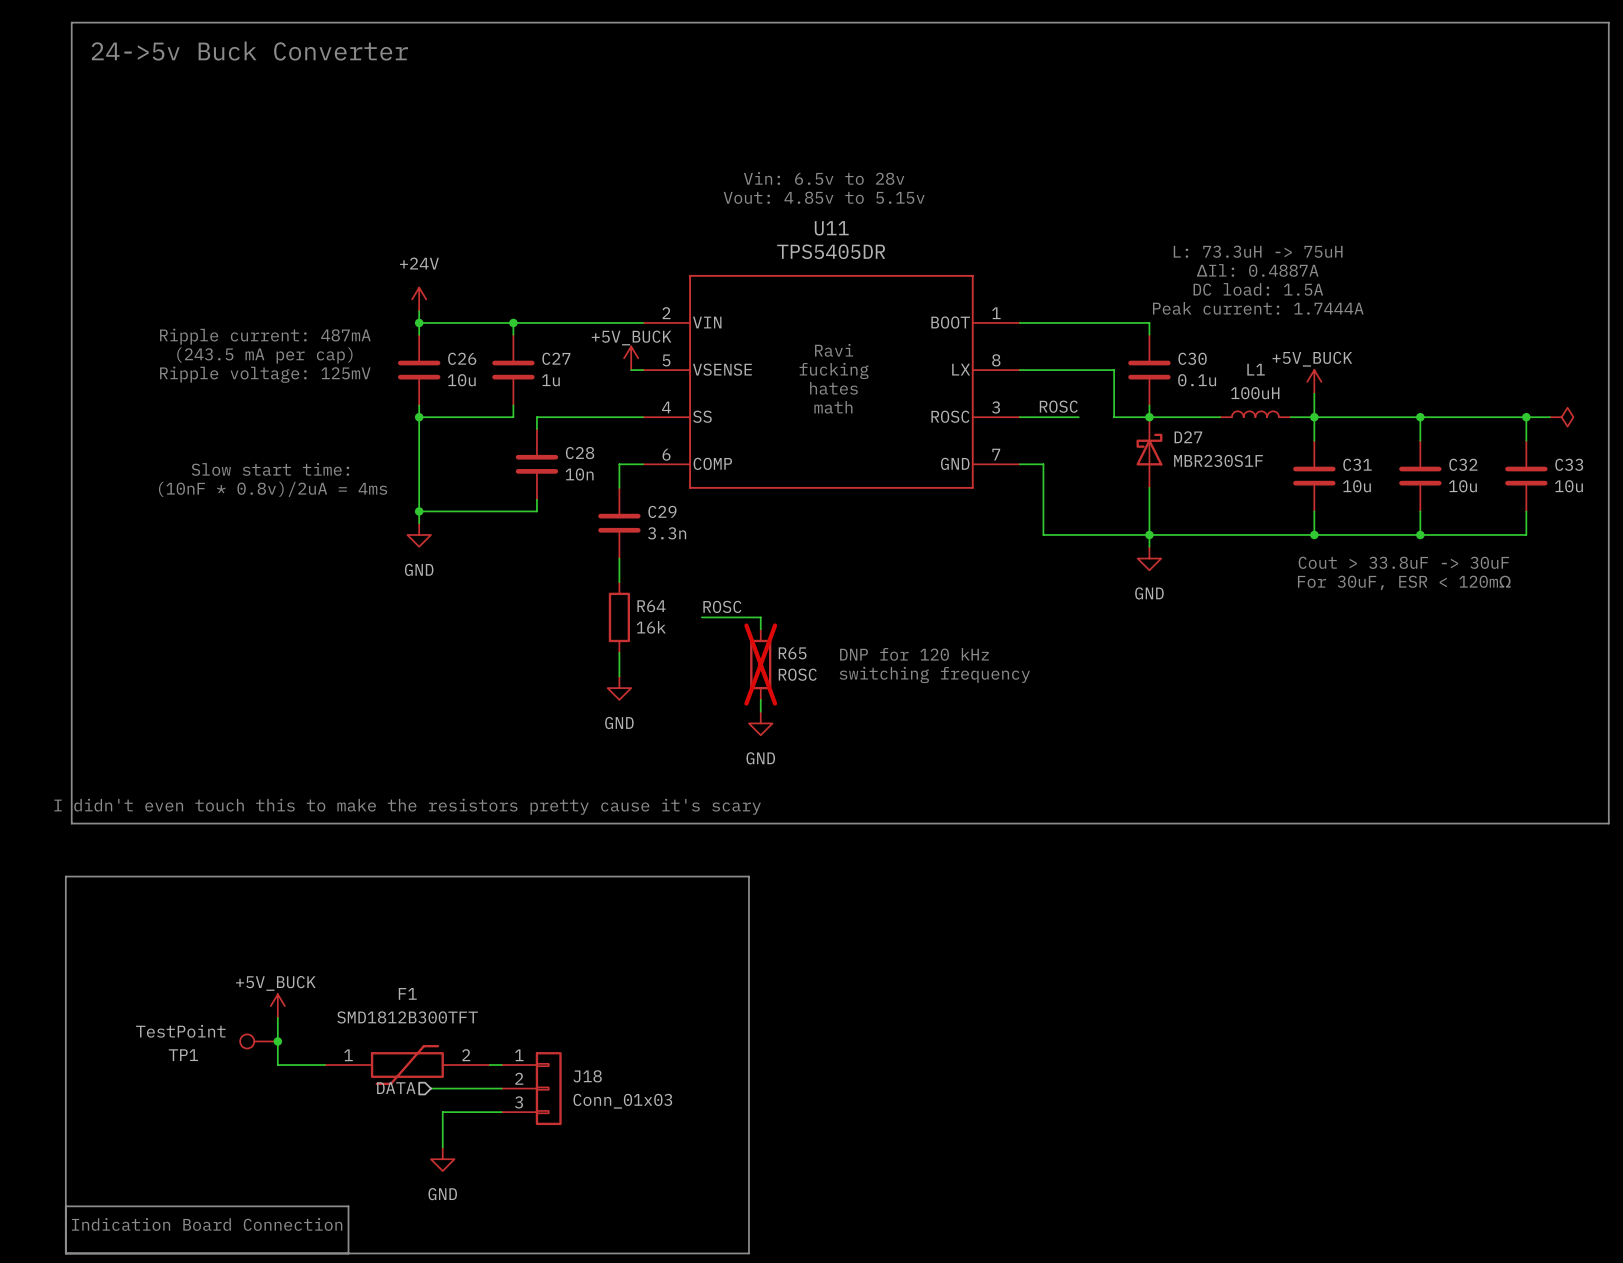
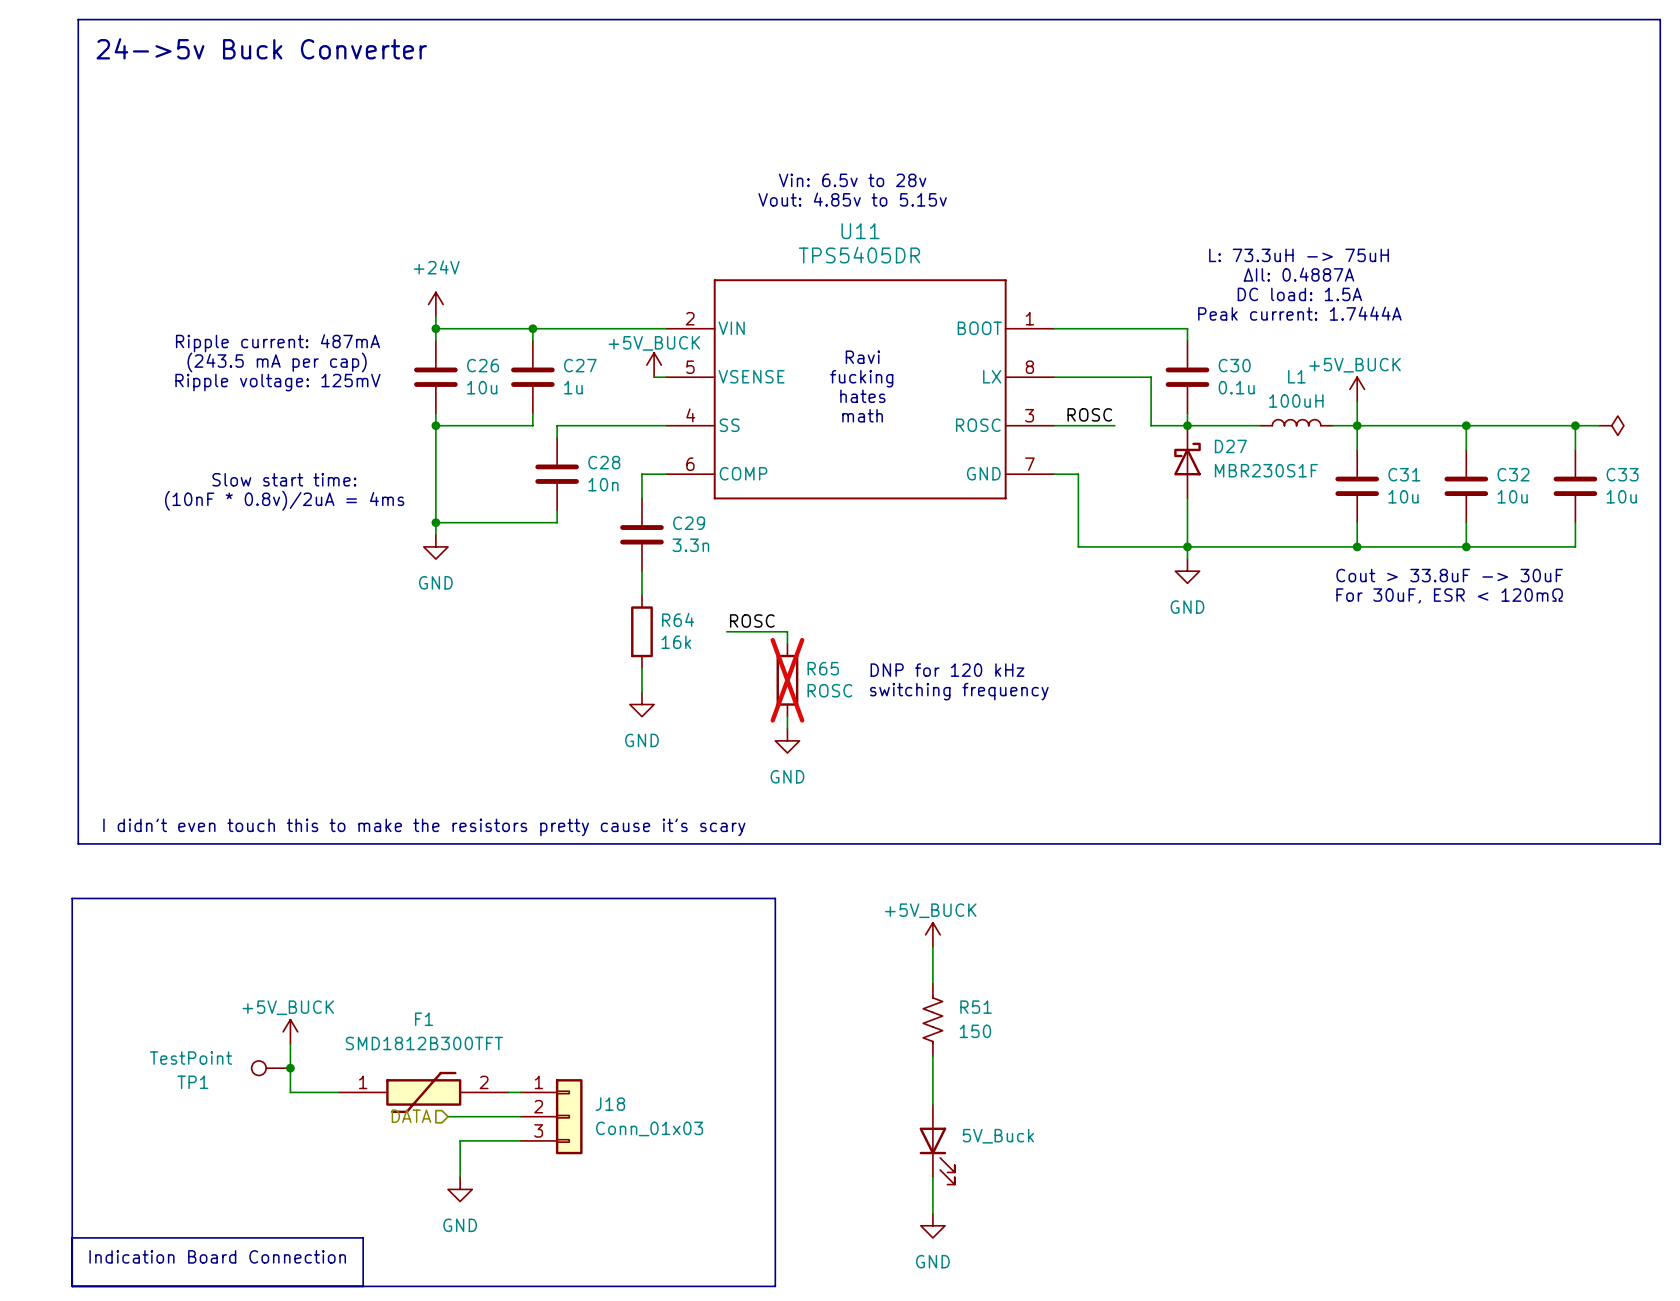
power symbol: none -> +5V_BUCK (932, 934)
wire: none -> (932, 946) (932, 983)
R51: none -> 150 (932, 1019)
wire: none -> (932, 1056) (932, 1104)
part: none -> 5V_Buck (937, 1144)
wire: none -> (932, 1177) (932, 1213)
power symbol: none -> GND (932, 1225)

